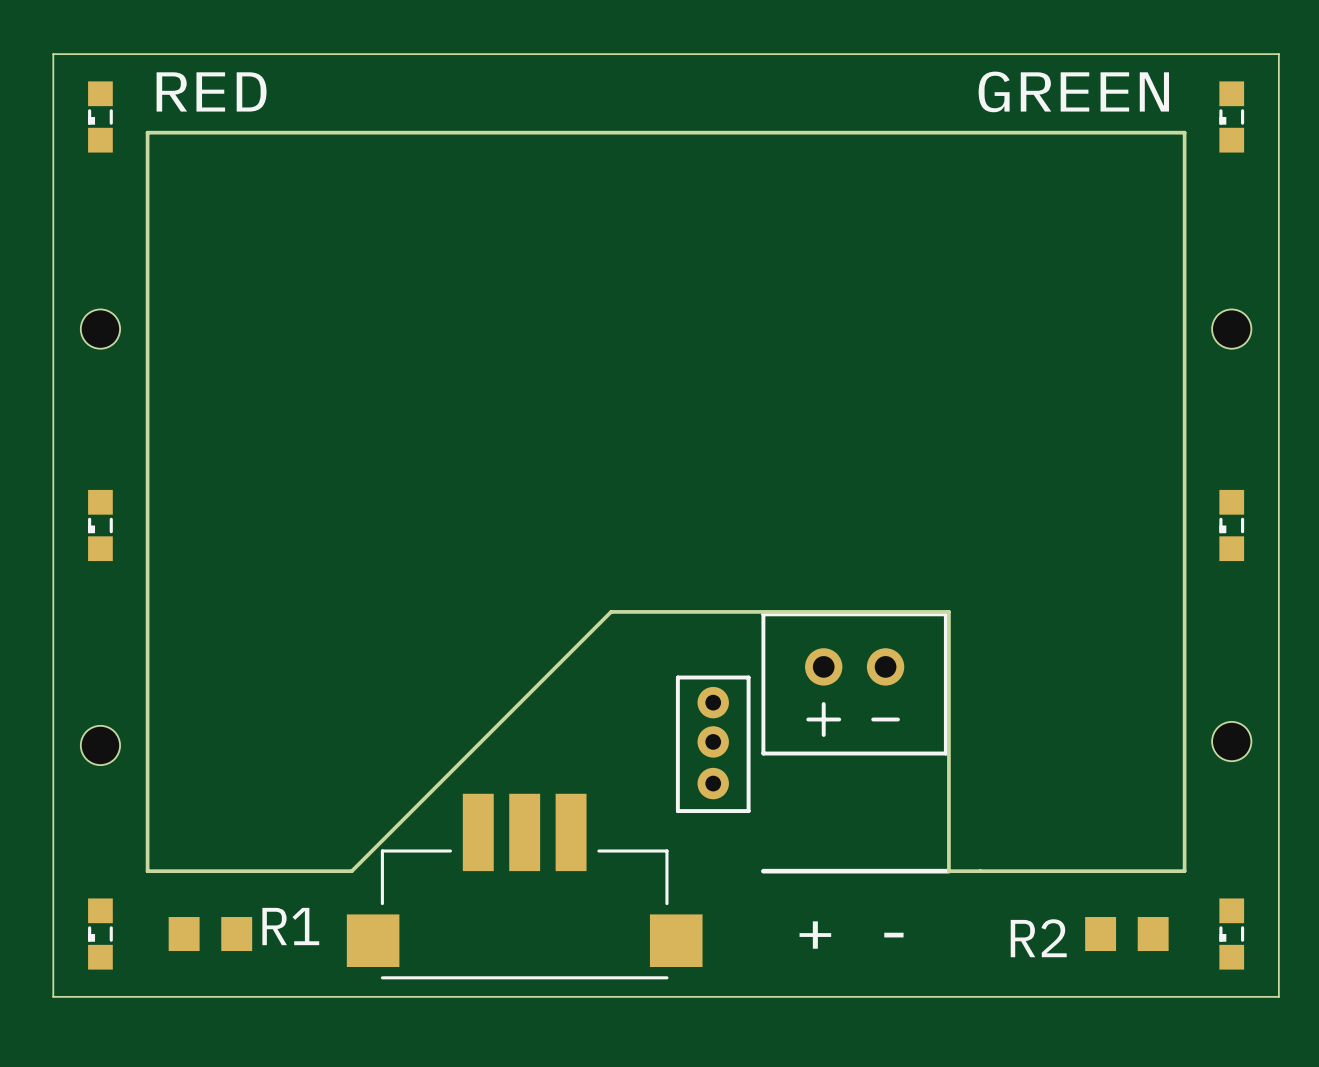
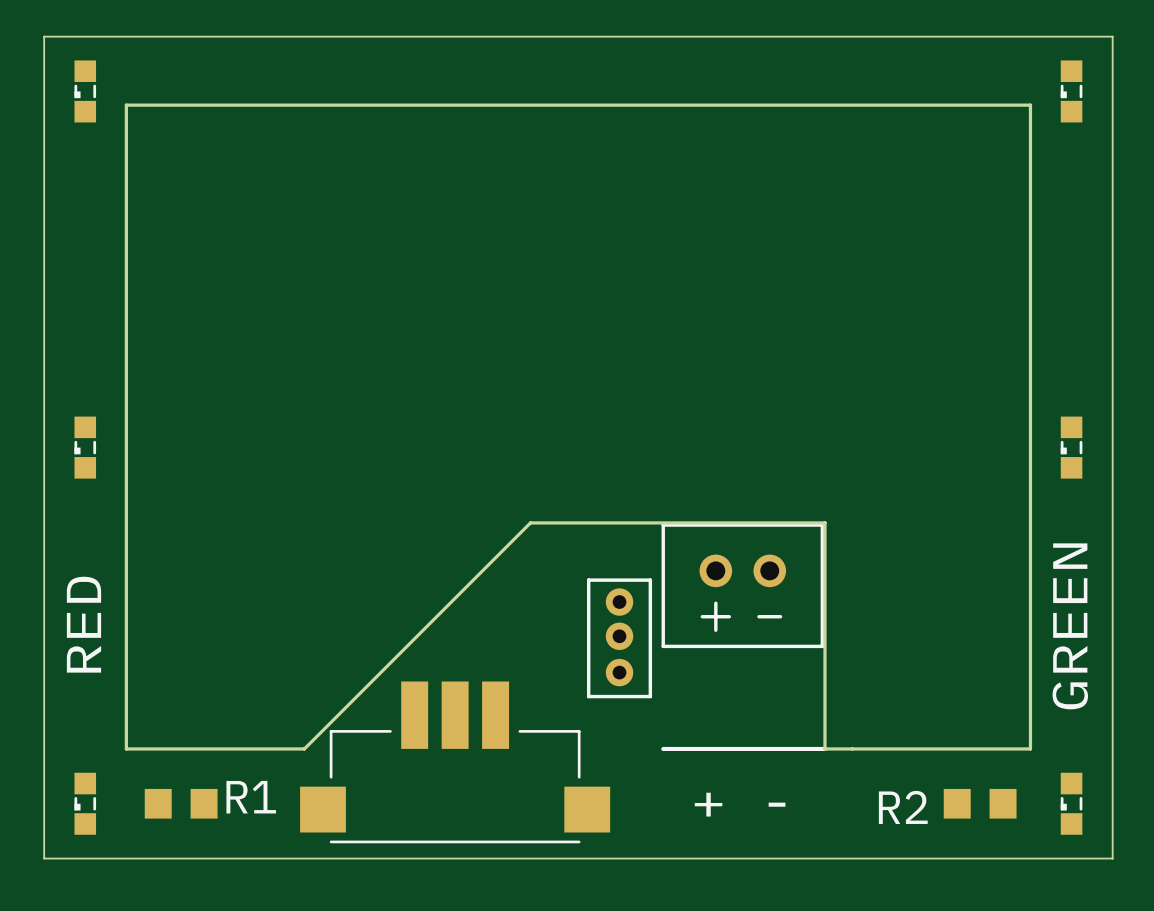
text rotation: 0° (211, 91) -> 90° counterclockwise (83, 624)
text position: RED (211, 91) -> RED (83, 624)
text rotation: 0° (1073, 91) -> 90° counterclockwise (1070, 626)
text position: GREEN (1073, 91) -> GREEN (1070, 626)
part: (100, 329) -> none
part: (1231, 329) -> none
part: (1231, 741) -> none
part: (100, 745) -> none

